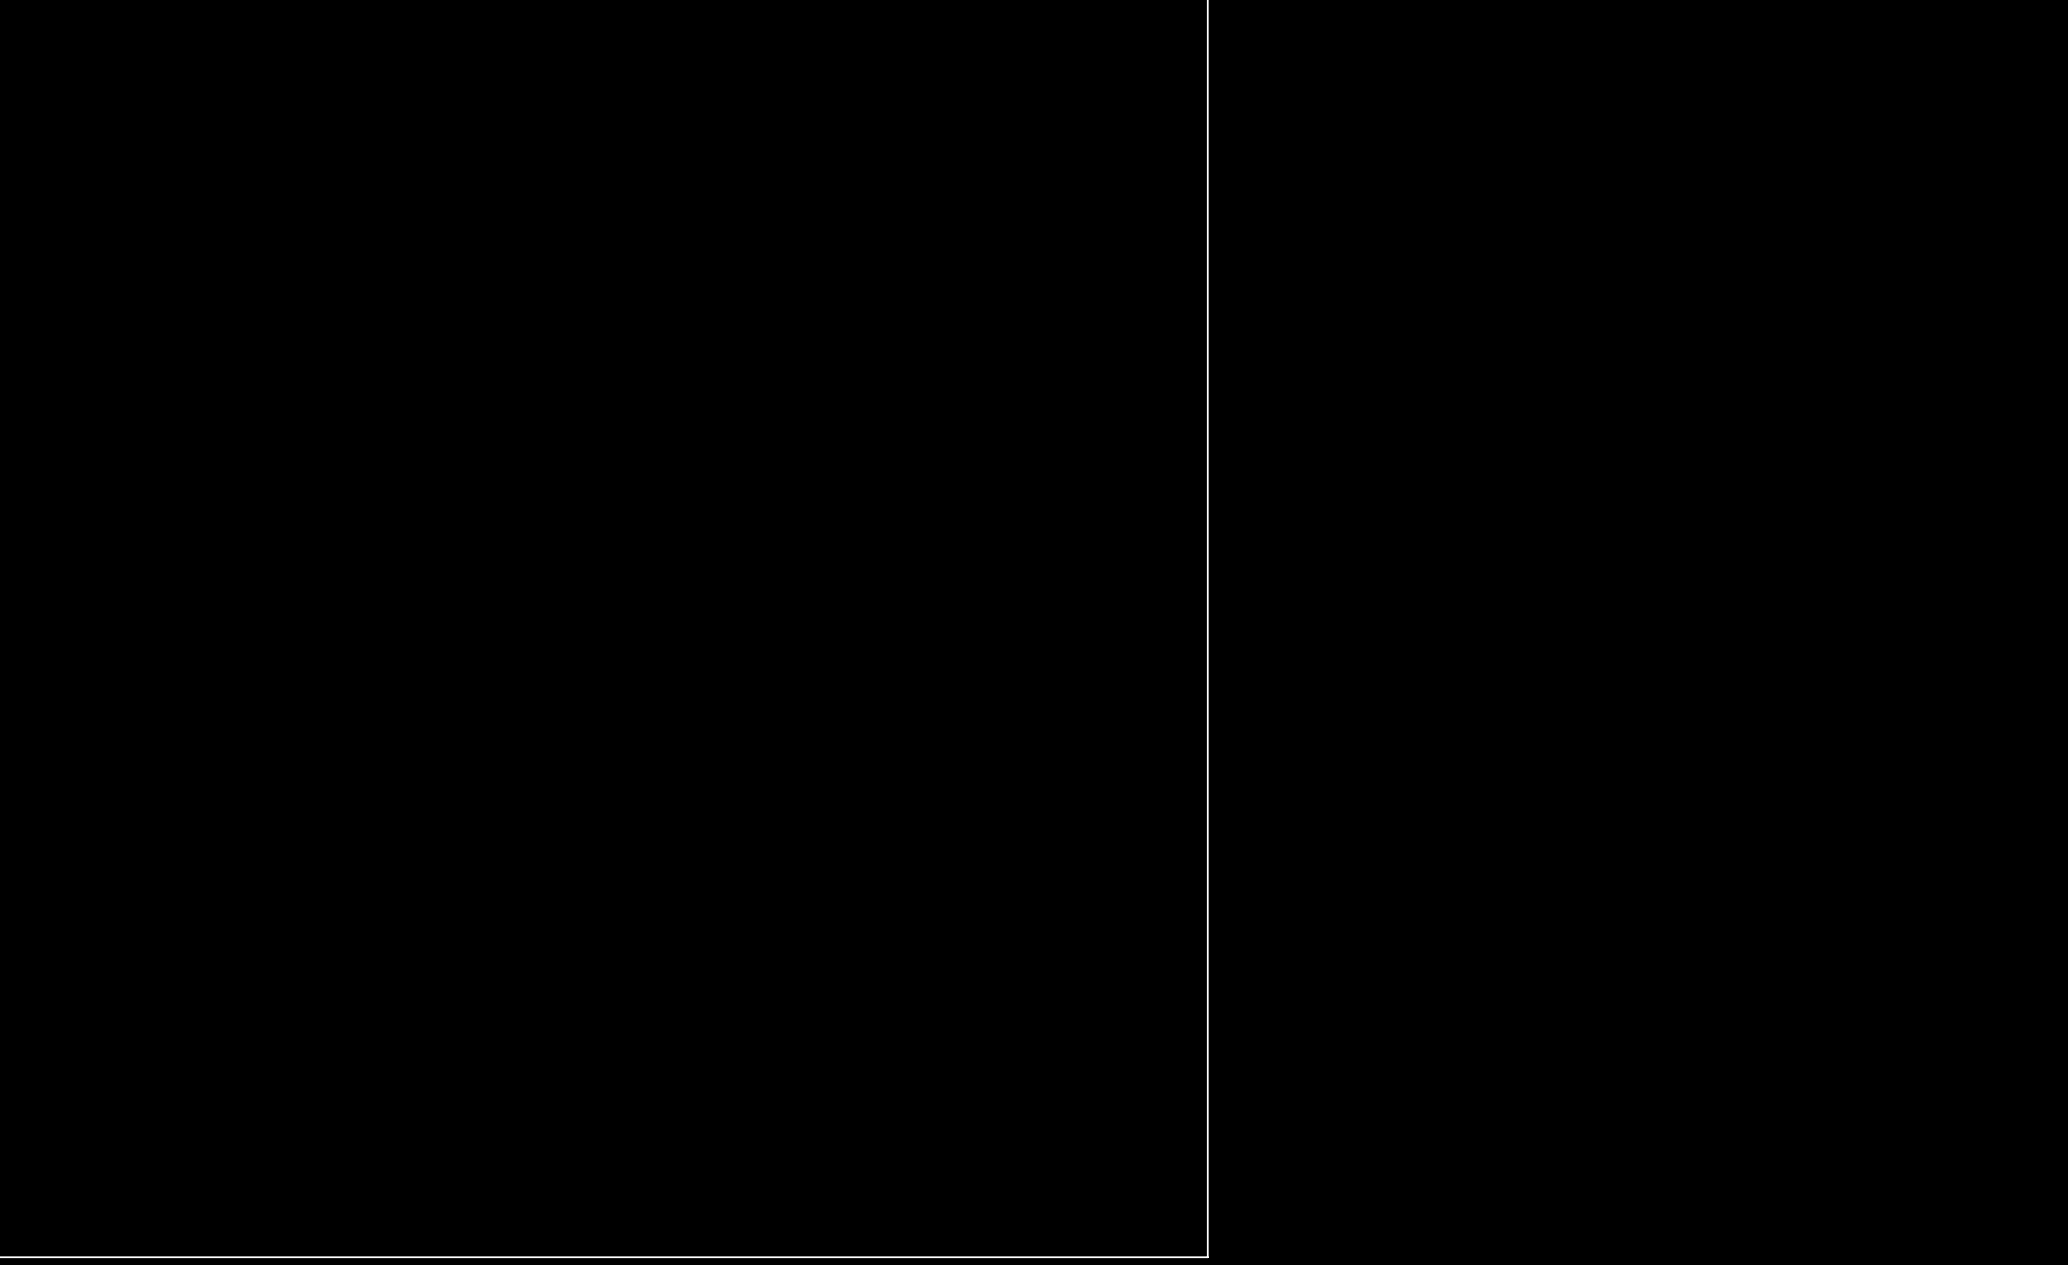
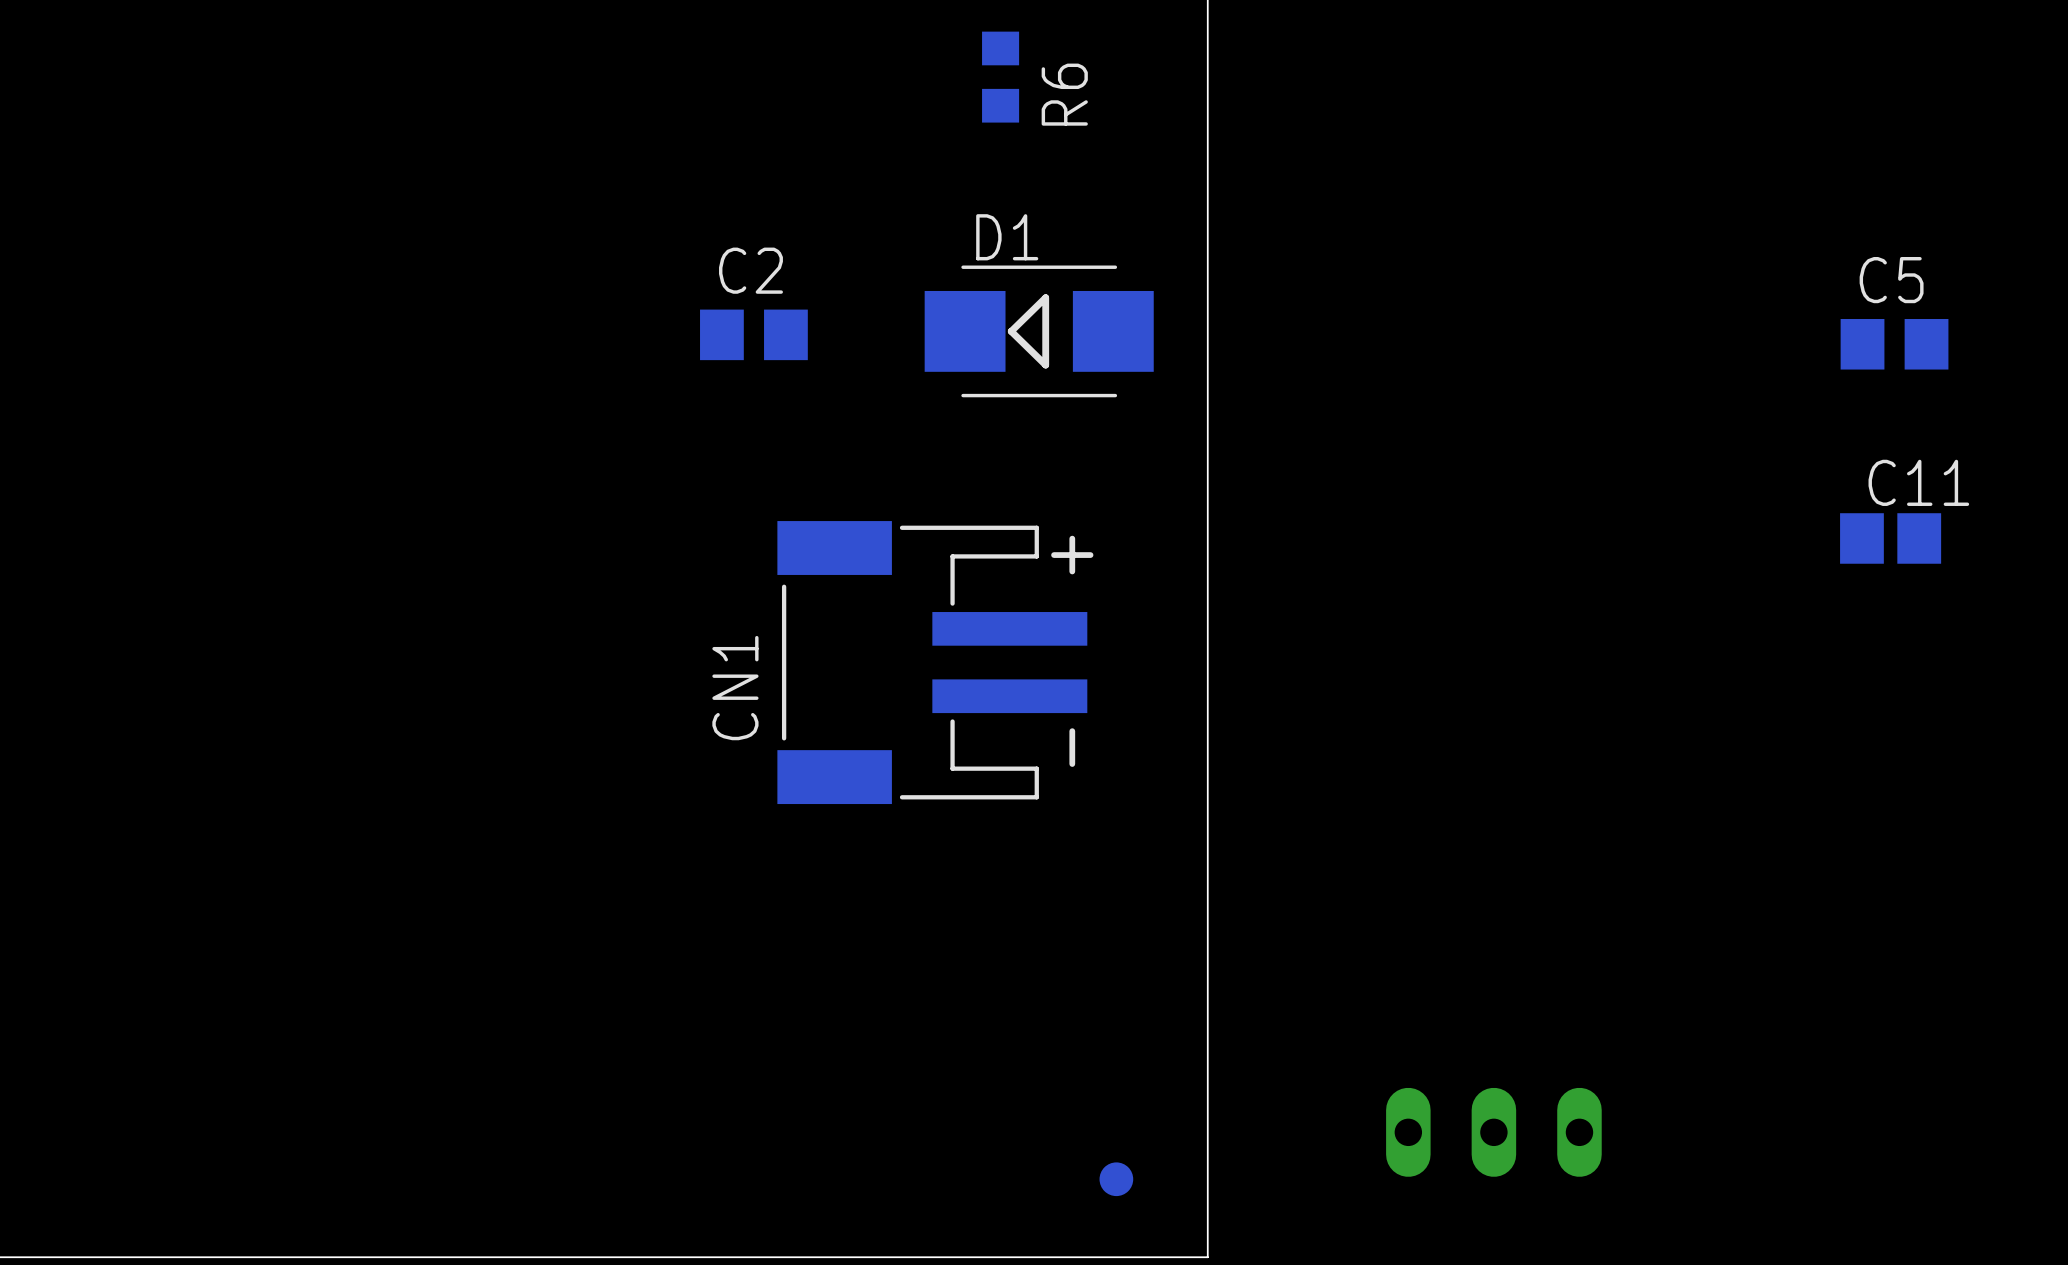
R6: none -> (1000, 77)
D1: none -> (1039, 331)
C2: none -> (753, 334)
C5: none -> (1894, 344)
C11: none -> (1890, 538)
CN1: none -> (932, 662)
part: none -> (1493, 1132)
part: none -> (1116, 1179)

